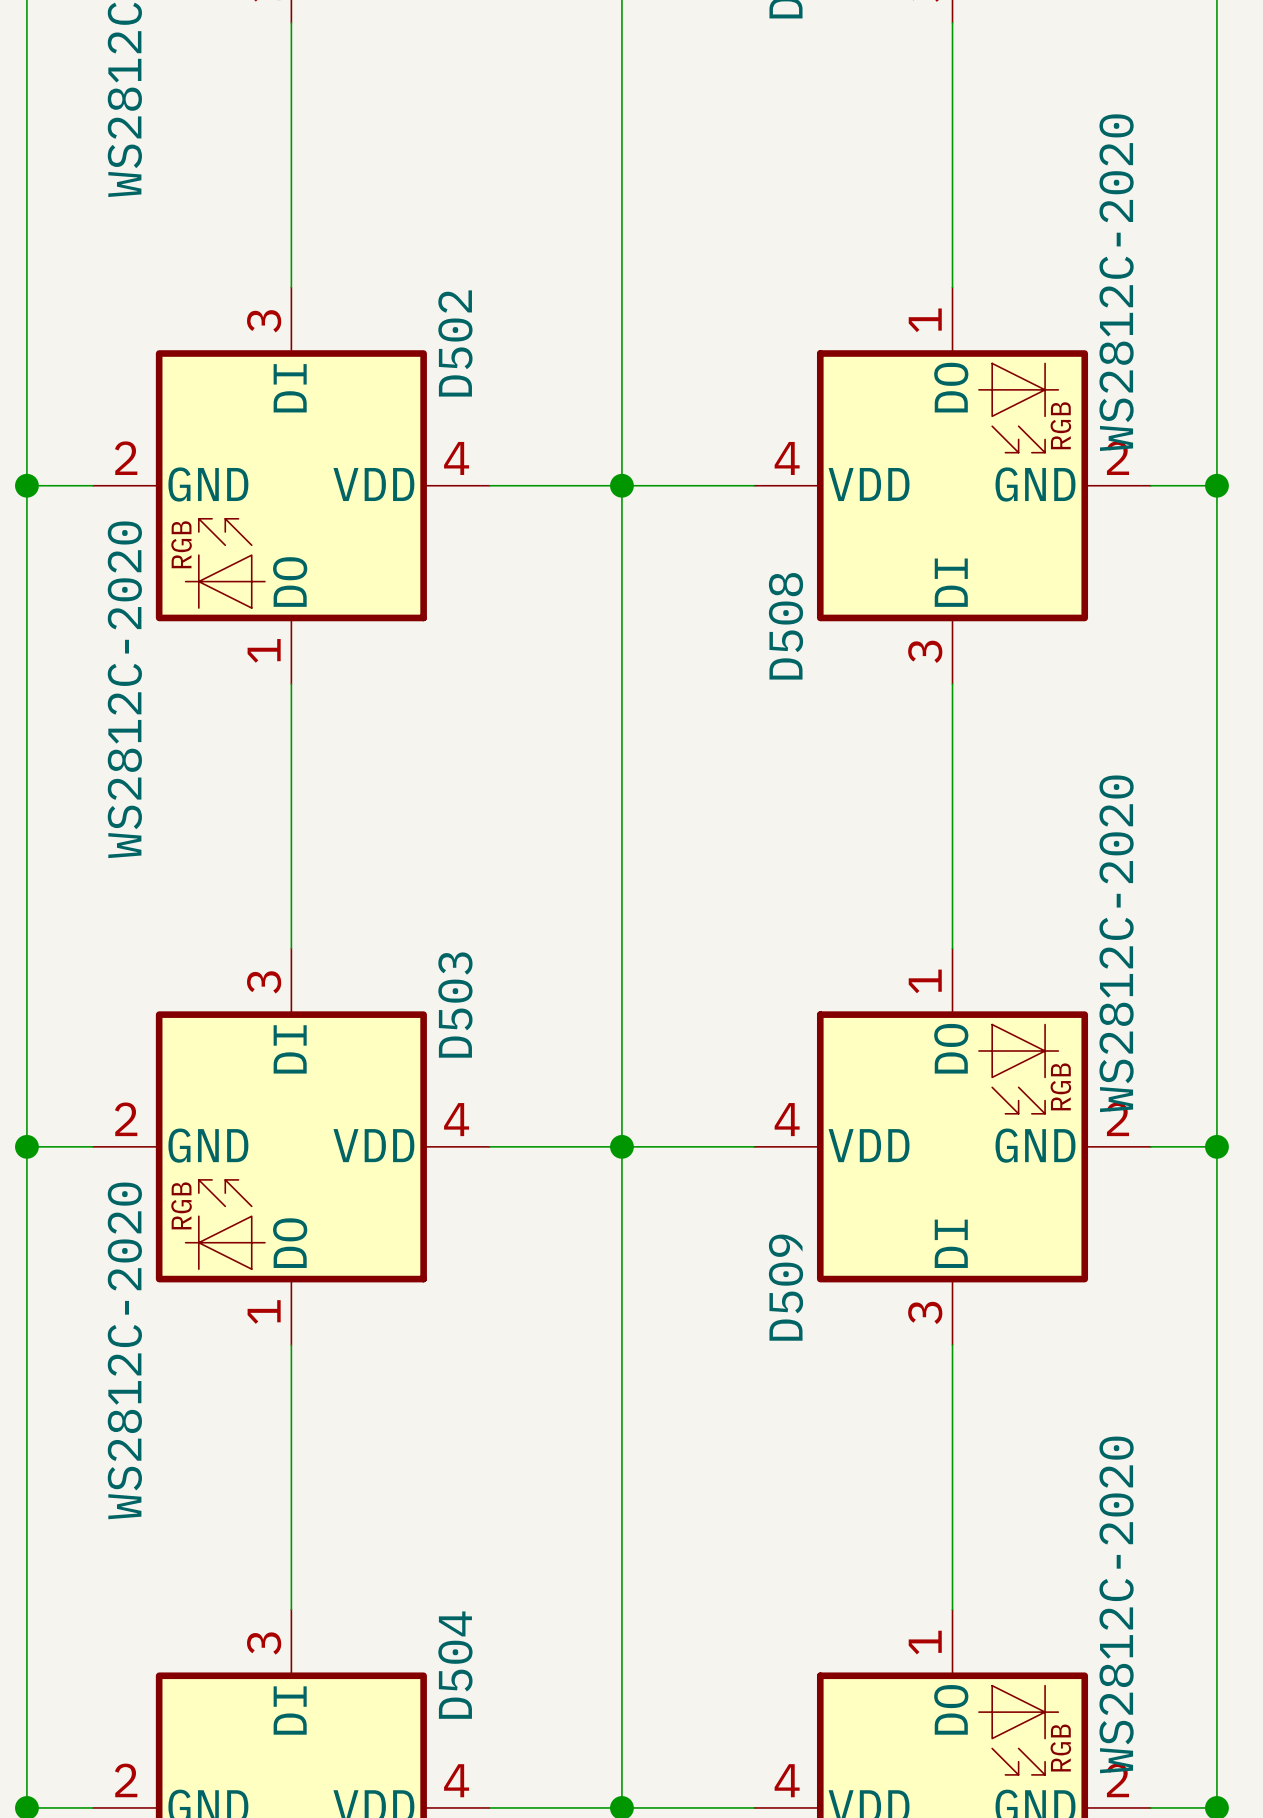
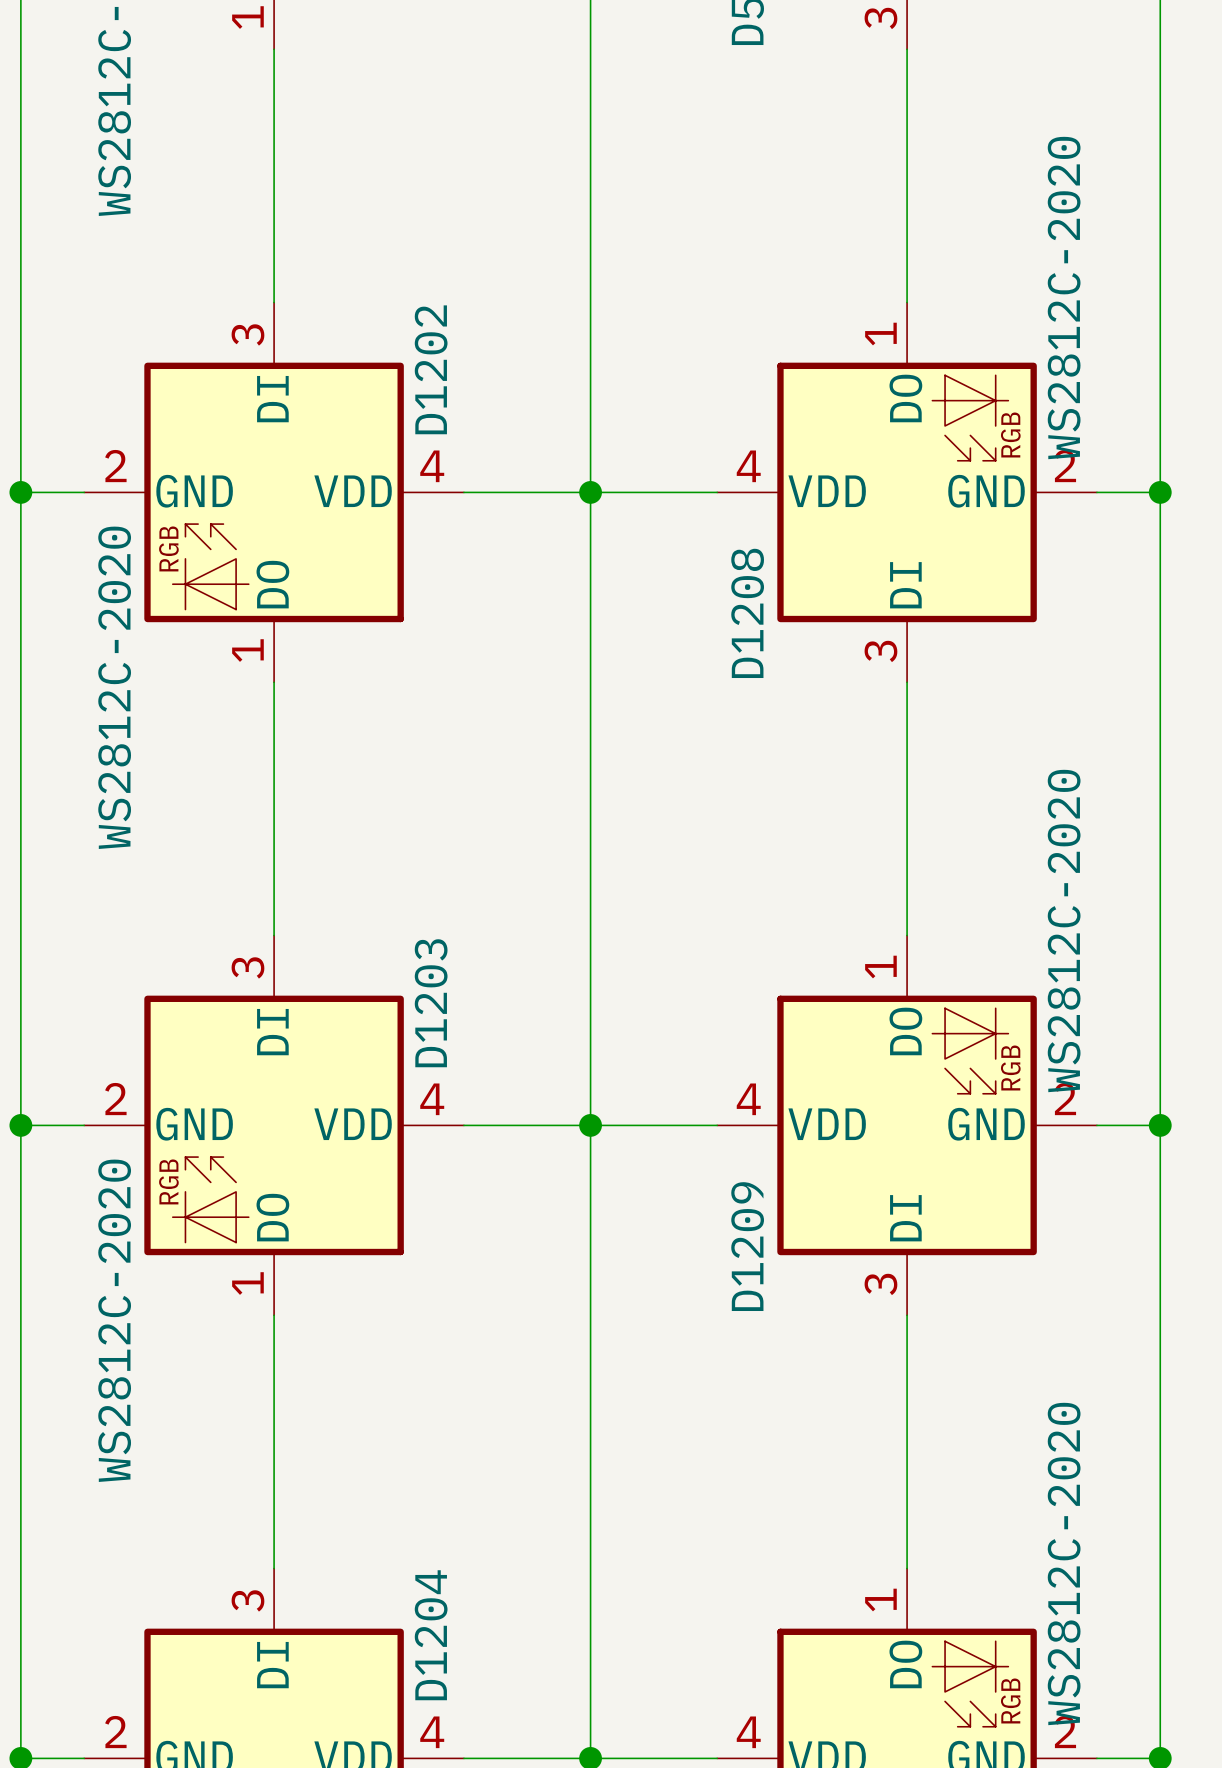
D502 name: D502 (455, 343) -> D1202 (431, 369)
D508 name: D508 (785, 626) -> D1208 (747, 613)
D503 name: D503 (455, 1005) -> D1203 (431, 1003)
D509 name: D509 (785, 1287) -> D1209 (747, 1246)
D504 name: D504 (455, 1665) -> D1204 (431, 1635)

